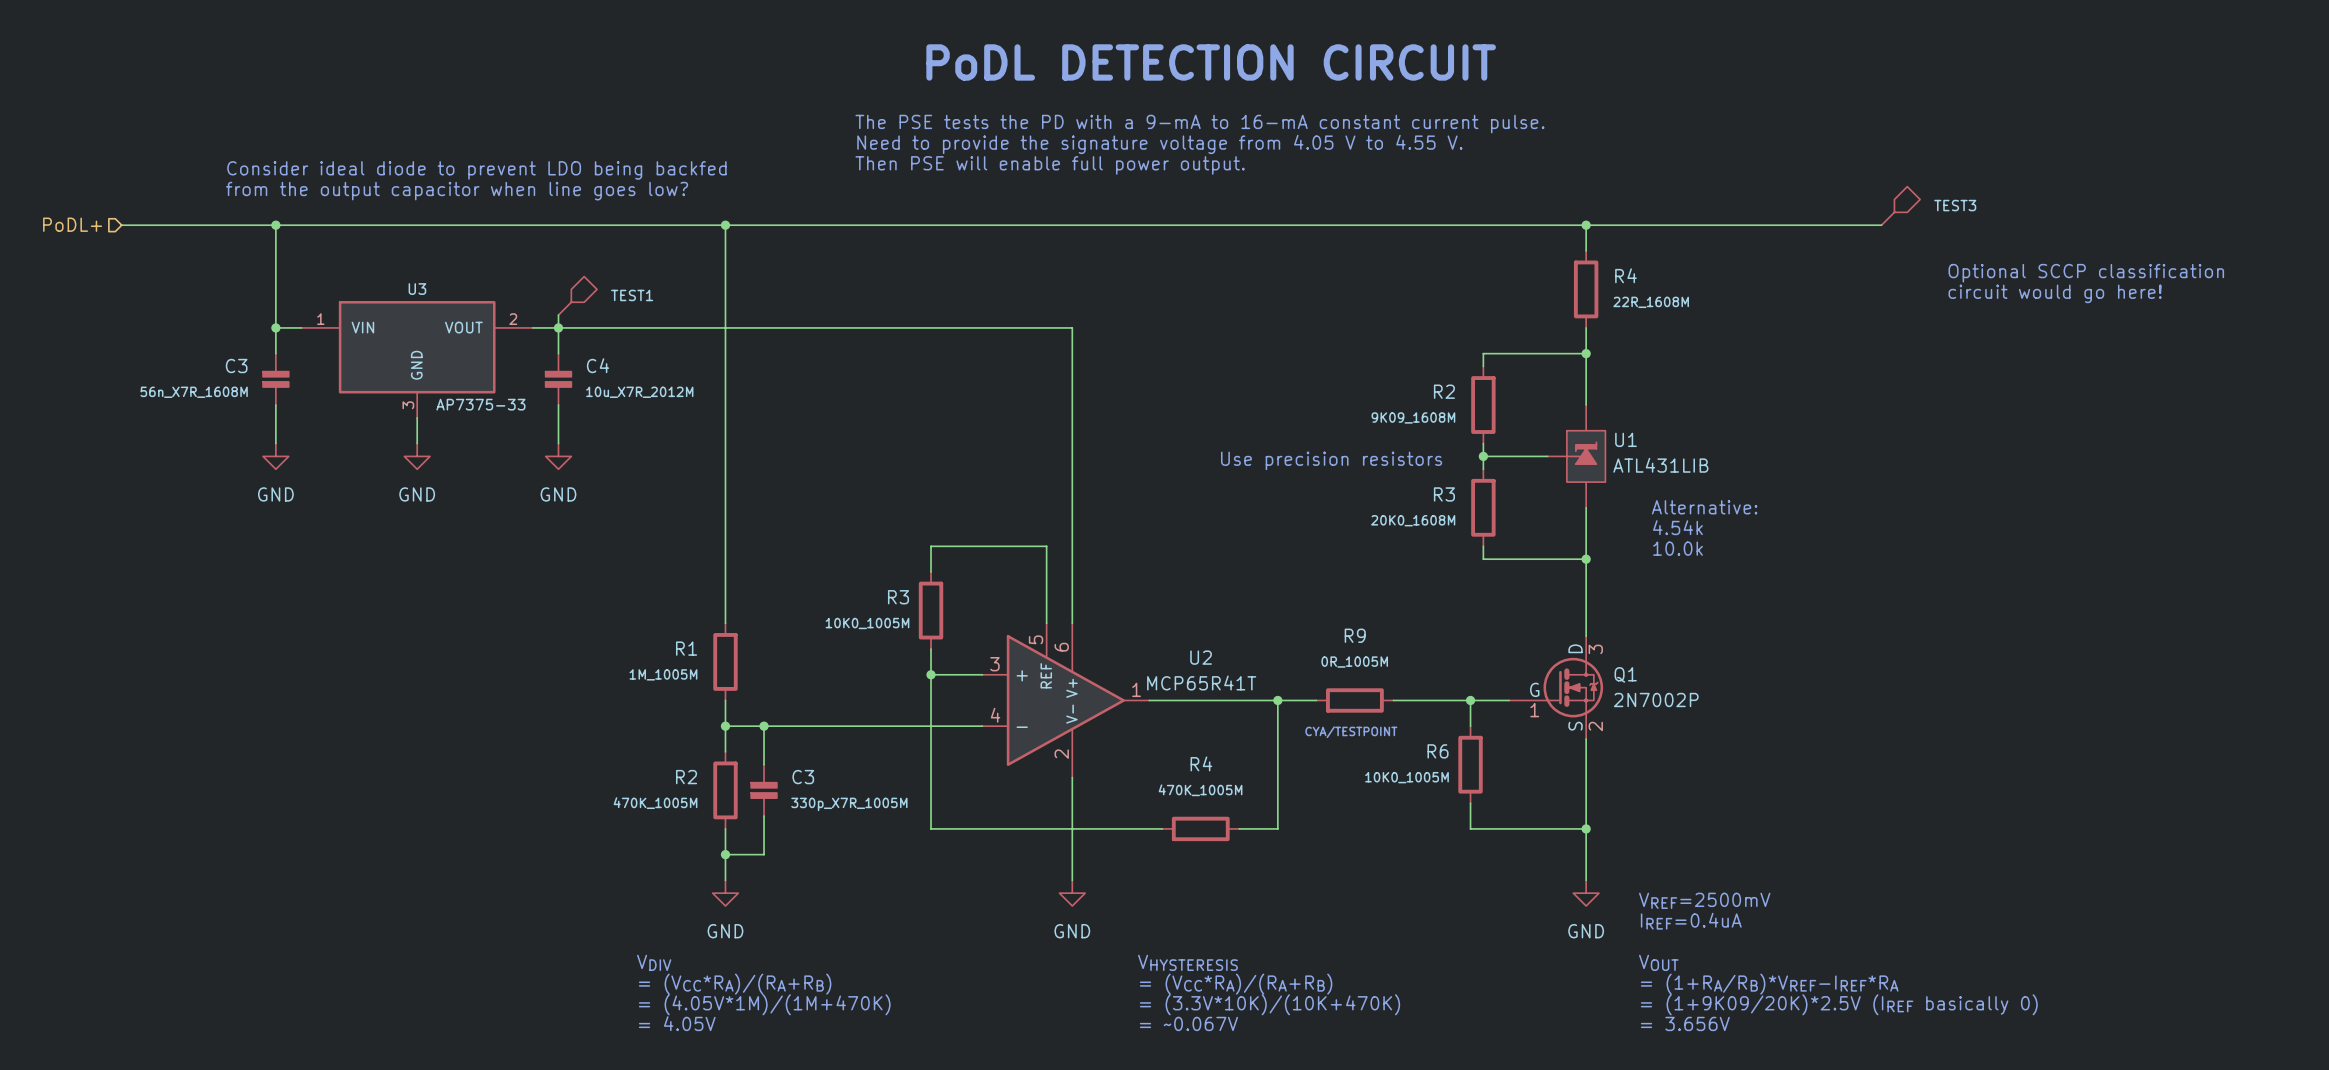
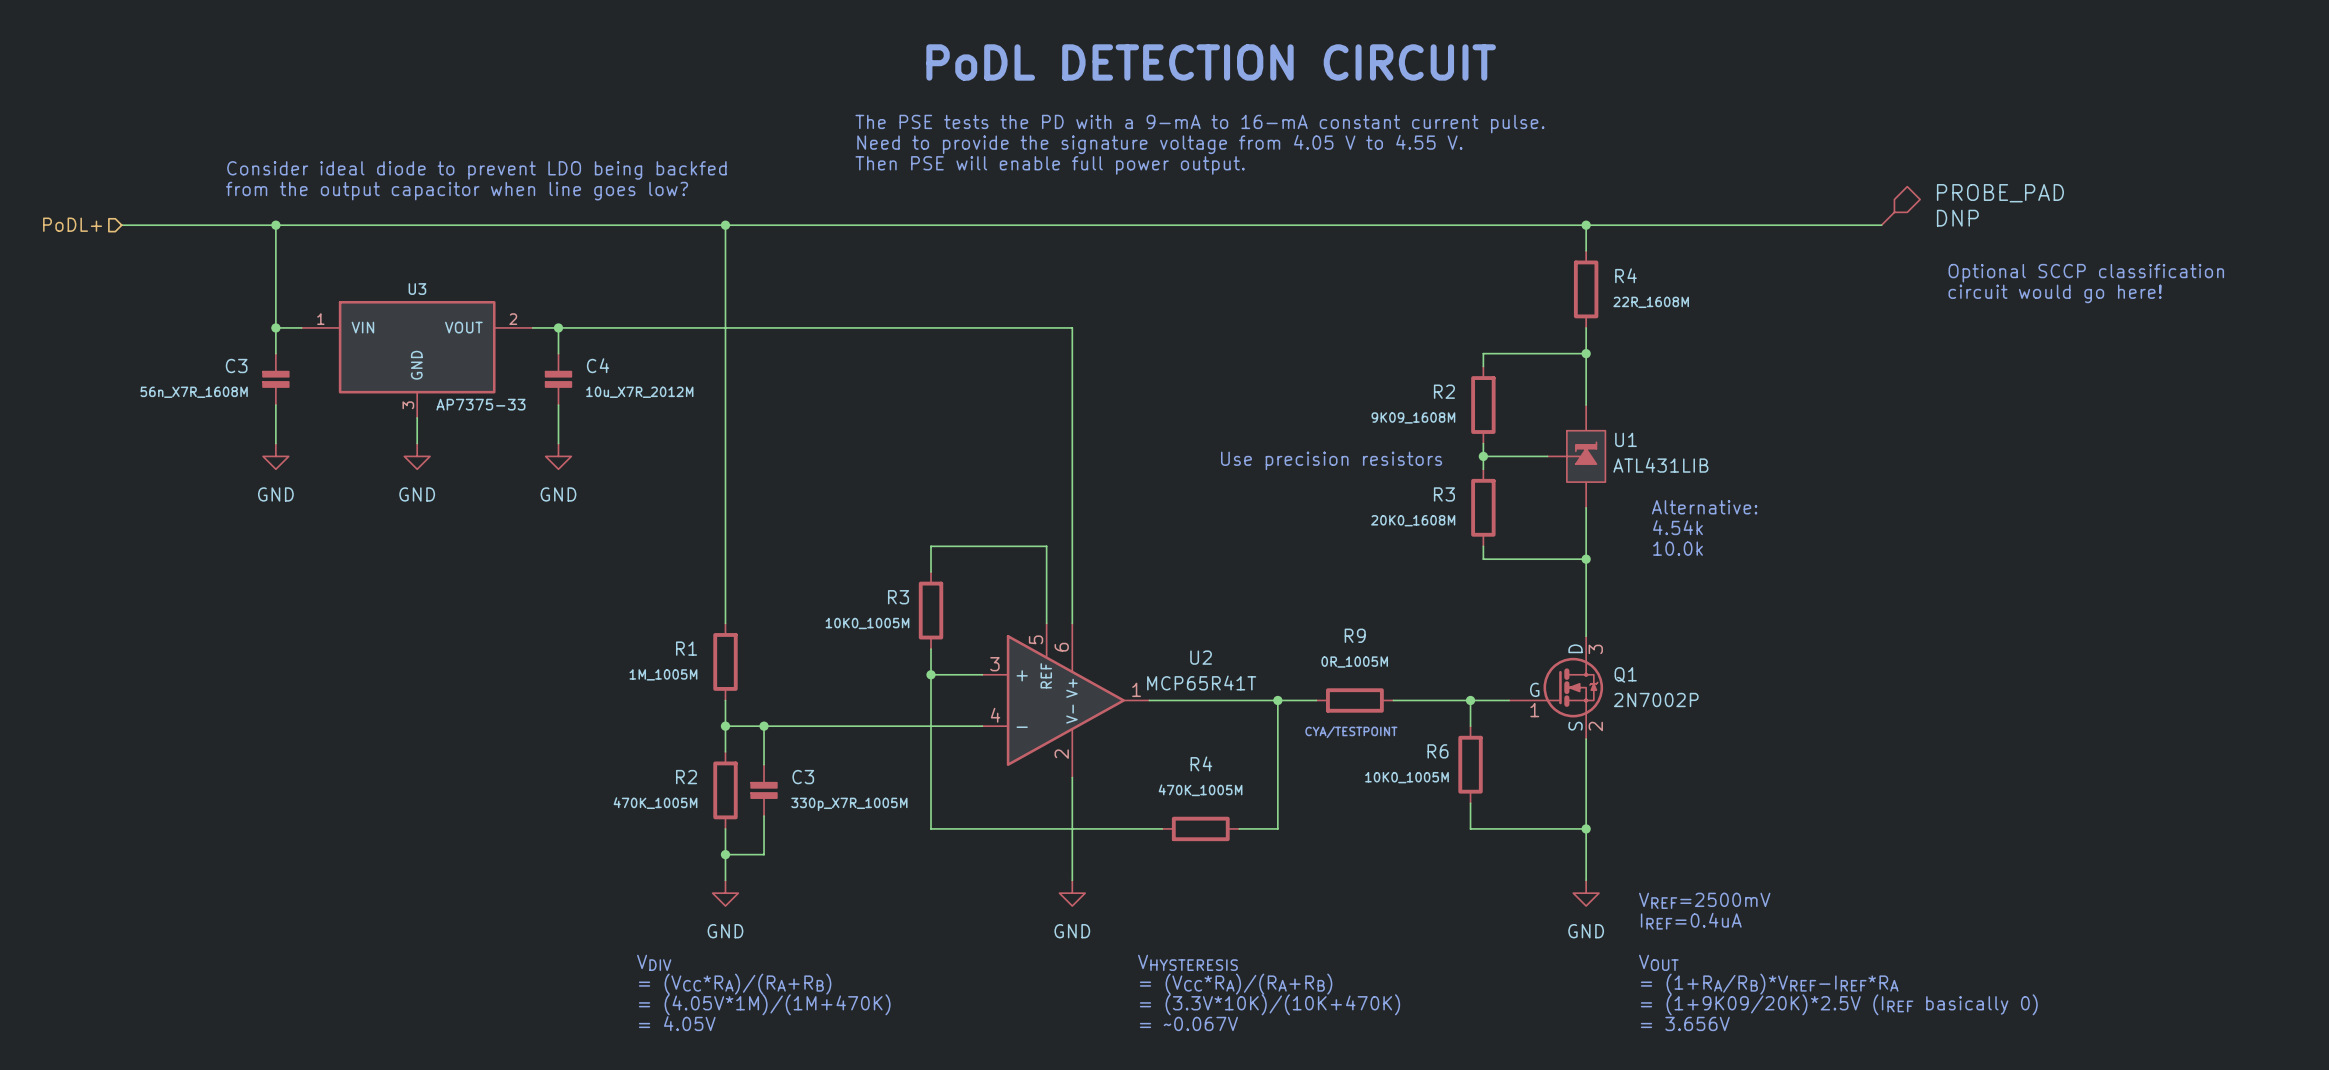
TEST3 value: none -> PROBE_PAD (2000, 193)
TEST3 name: TEST3 (1955, 205) -> none
TEST3 text: none -> DNP (1957, 218)
TEST1: (577, 295) -> none
wire: (558, 315) (558, 327) -> none

